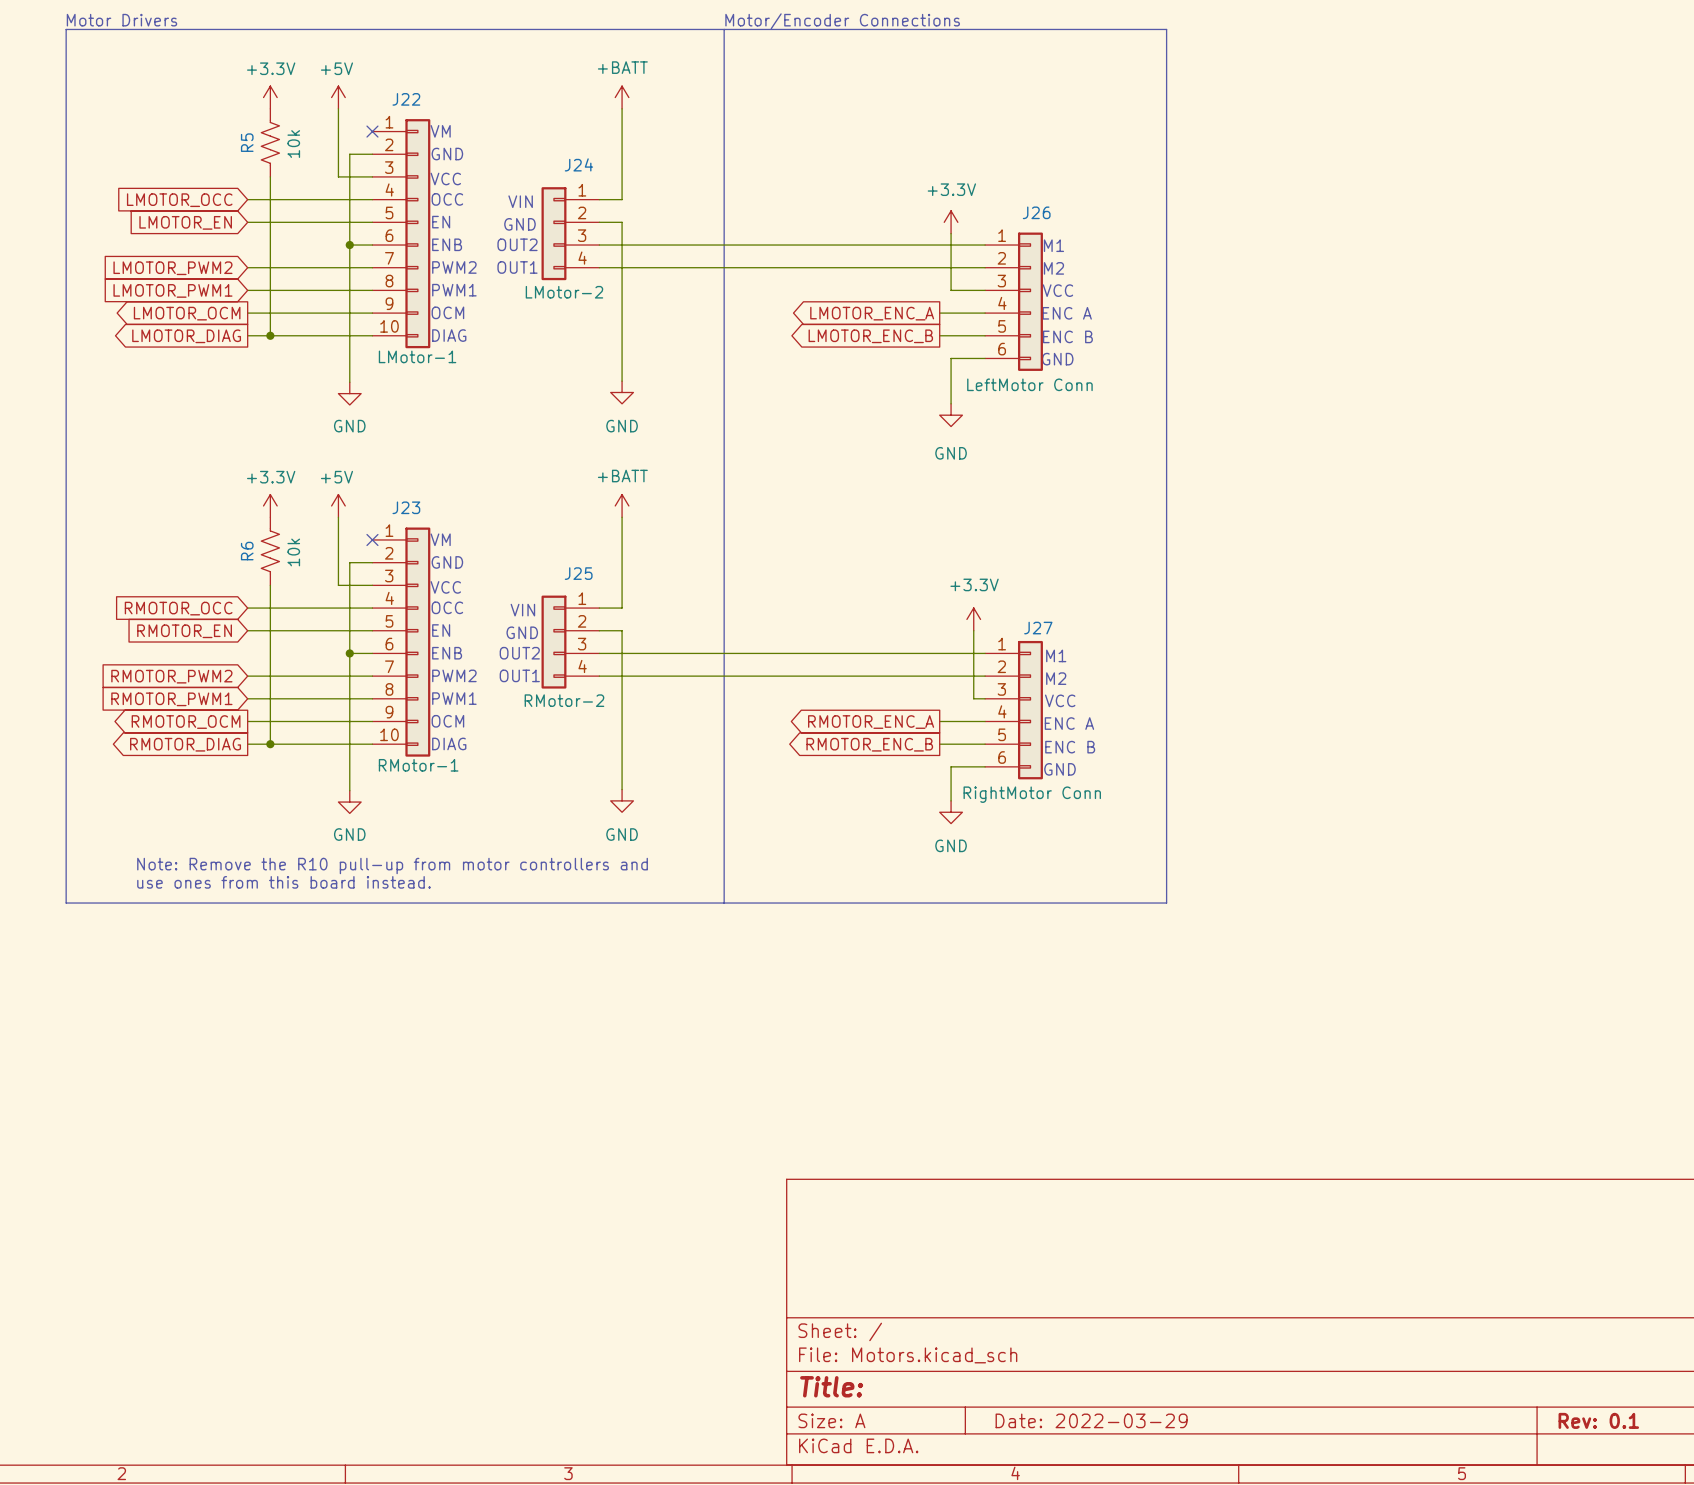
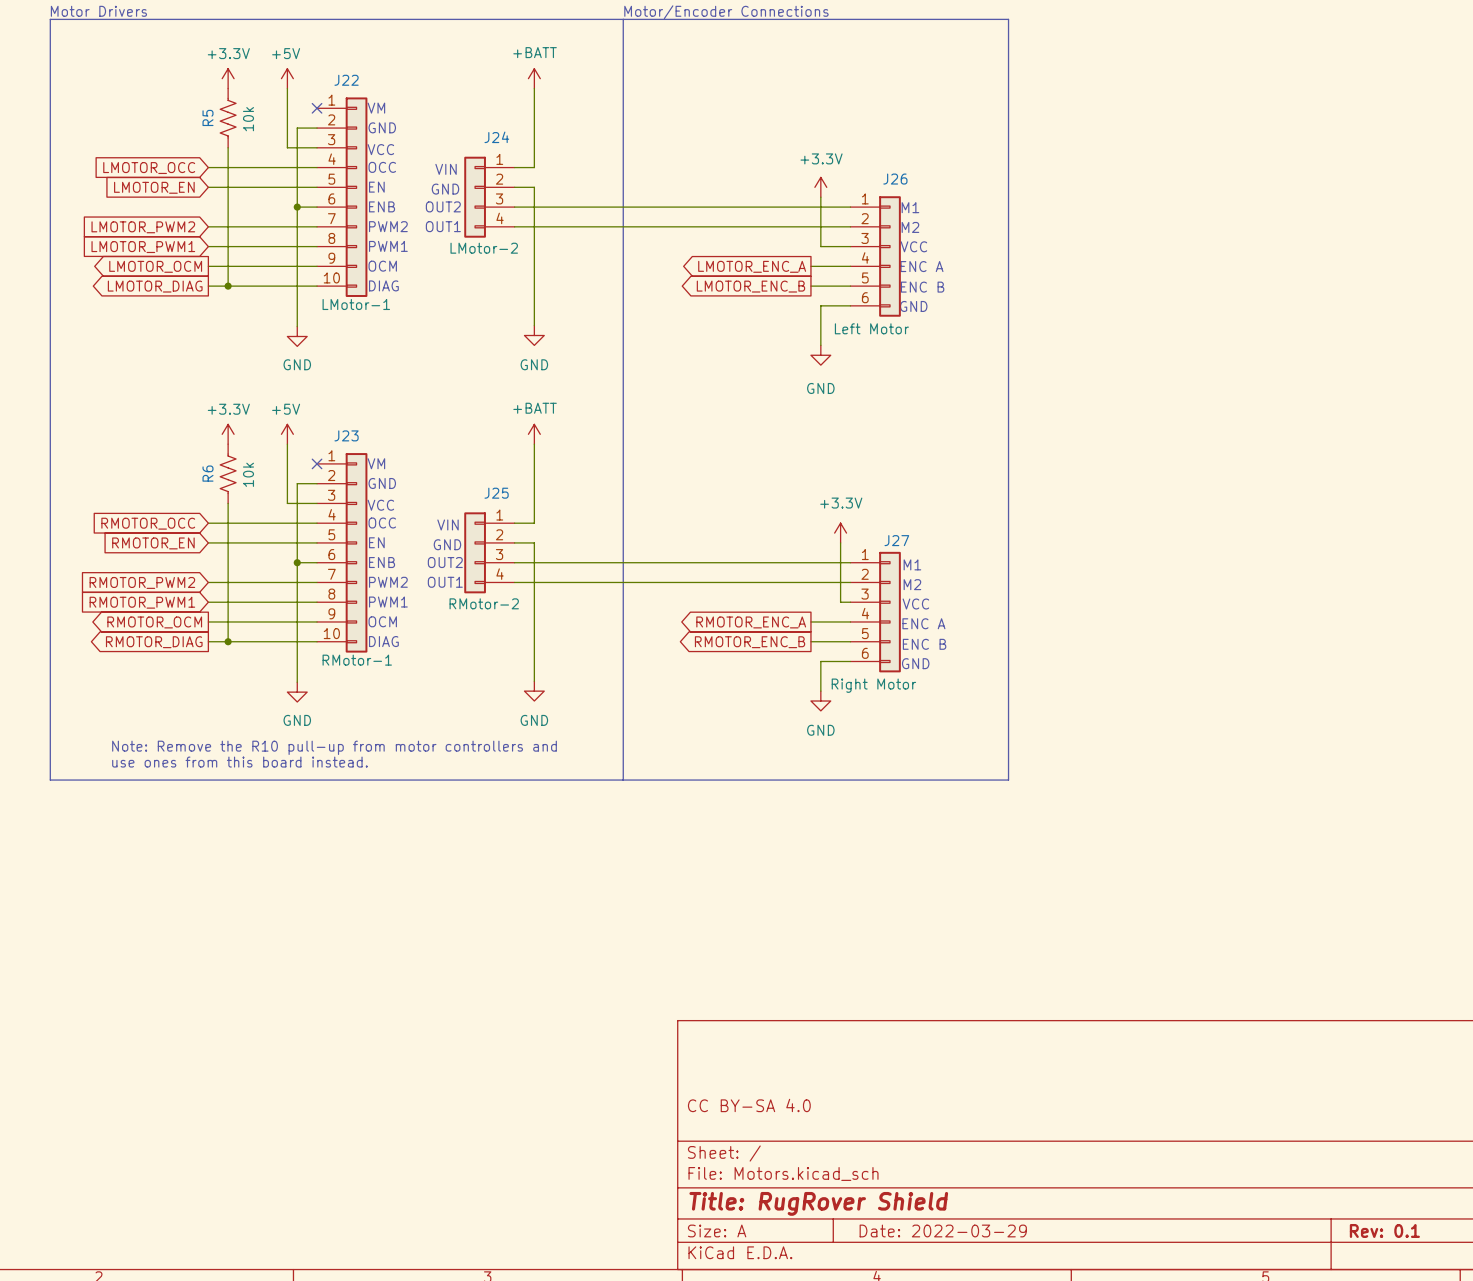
J26 value: LeftMotor Conn (1029, 384) -> Left Motor (871, 328)
J27 value: RightMotor Conn (1032, 794) -> Right Motor (873, 685)
title block: none -> CC BY-SA 4.0 (749, 1105)
title block: Title: (831, 1386) -> Title: RugRover Shield (818, 1203)

